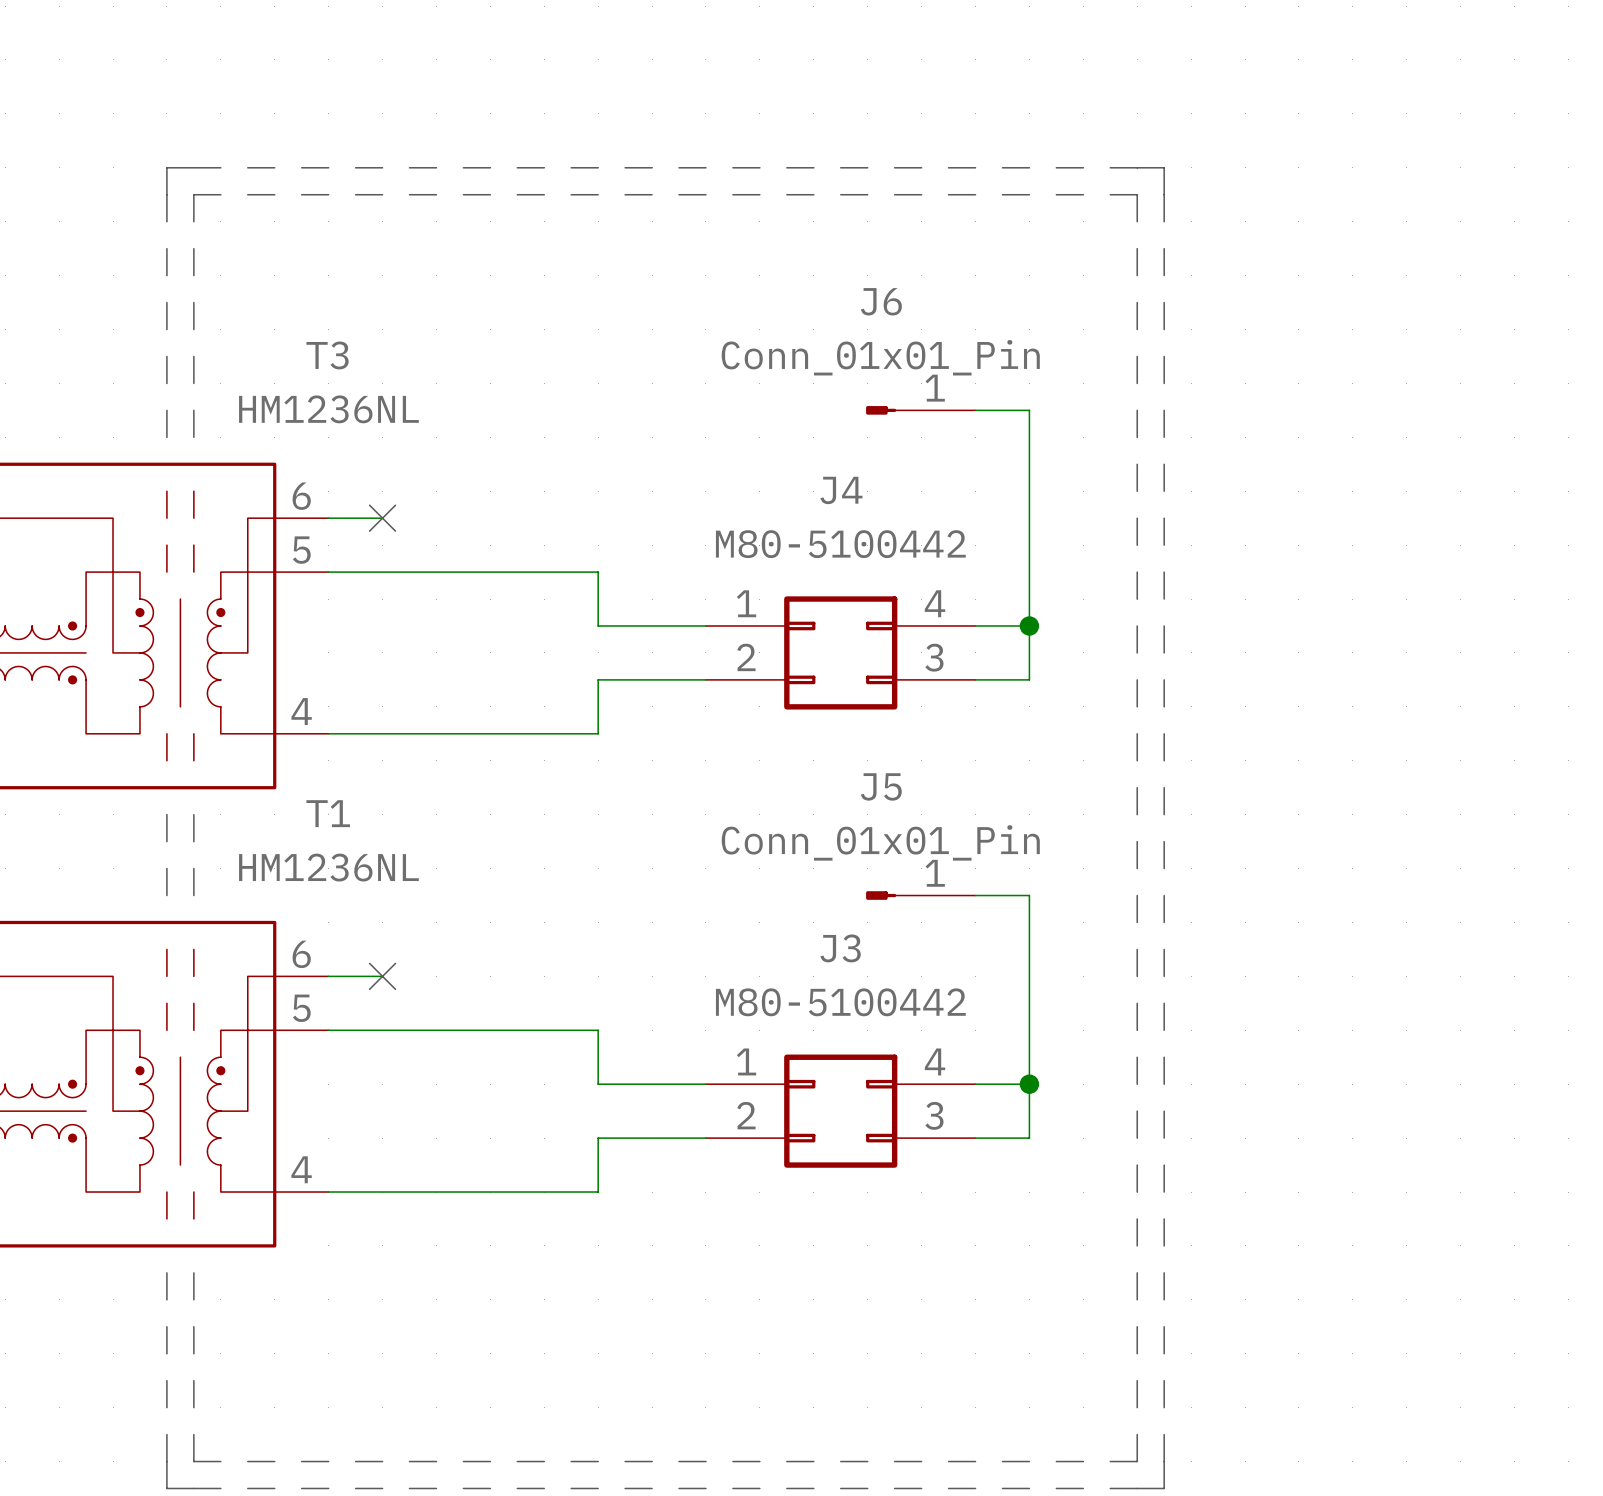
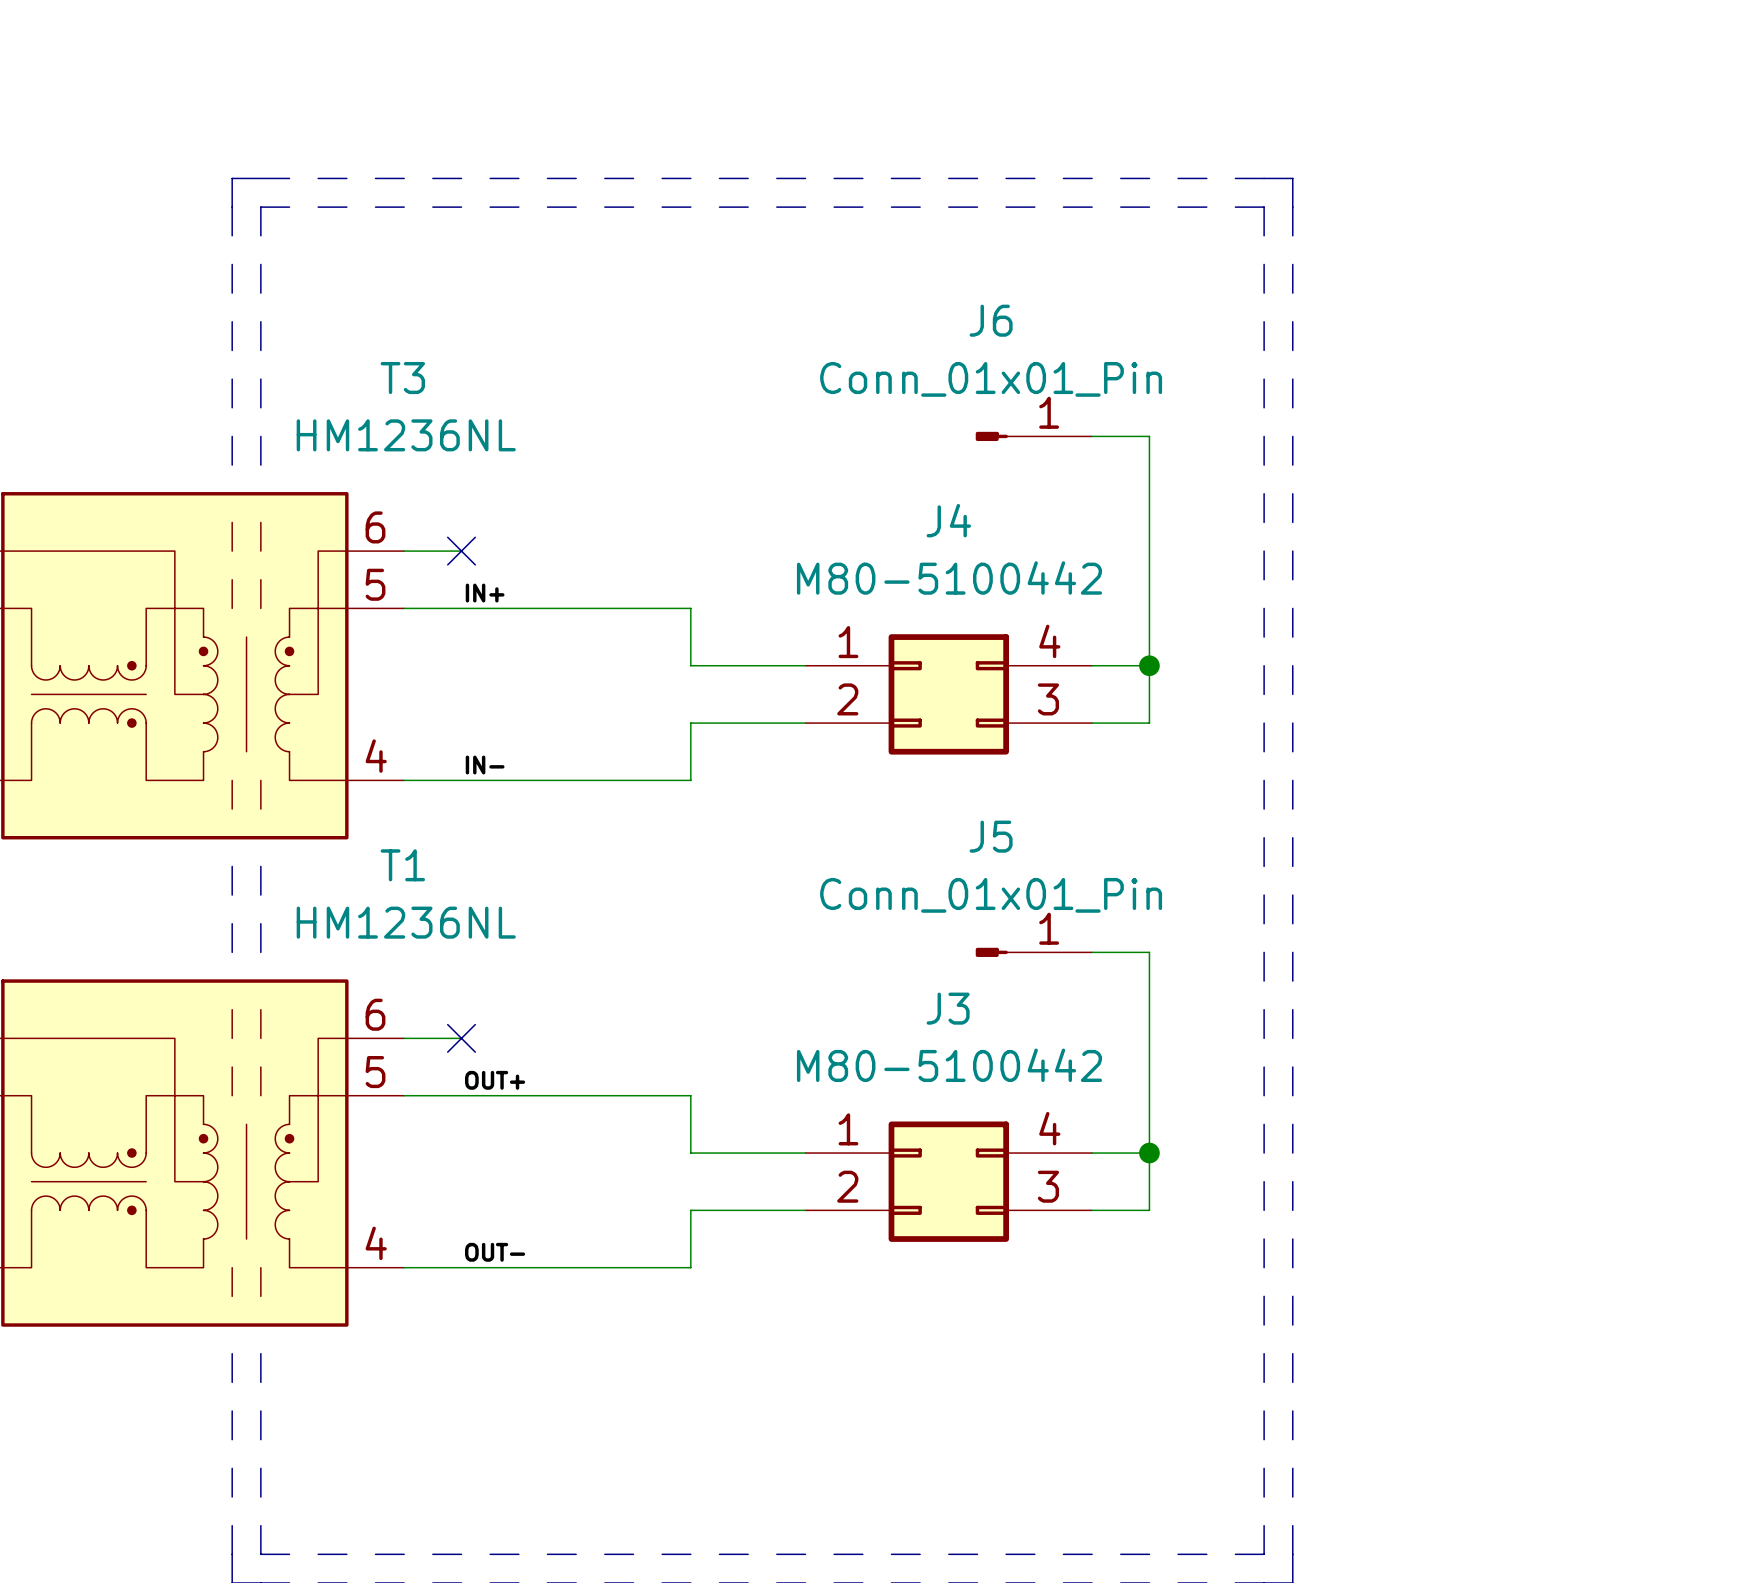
label: none -> IN+ (485, 593)
label: none -> IN- (485, 765)
label: none -> OUT+ (495, 1080)
label: none -> OUT- (495, 1252)

